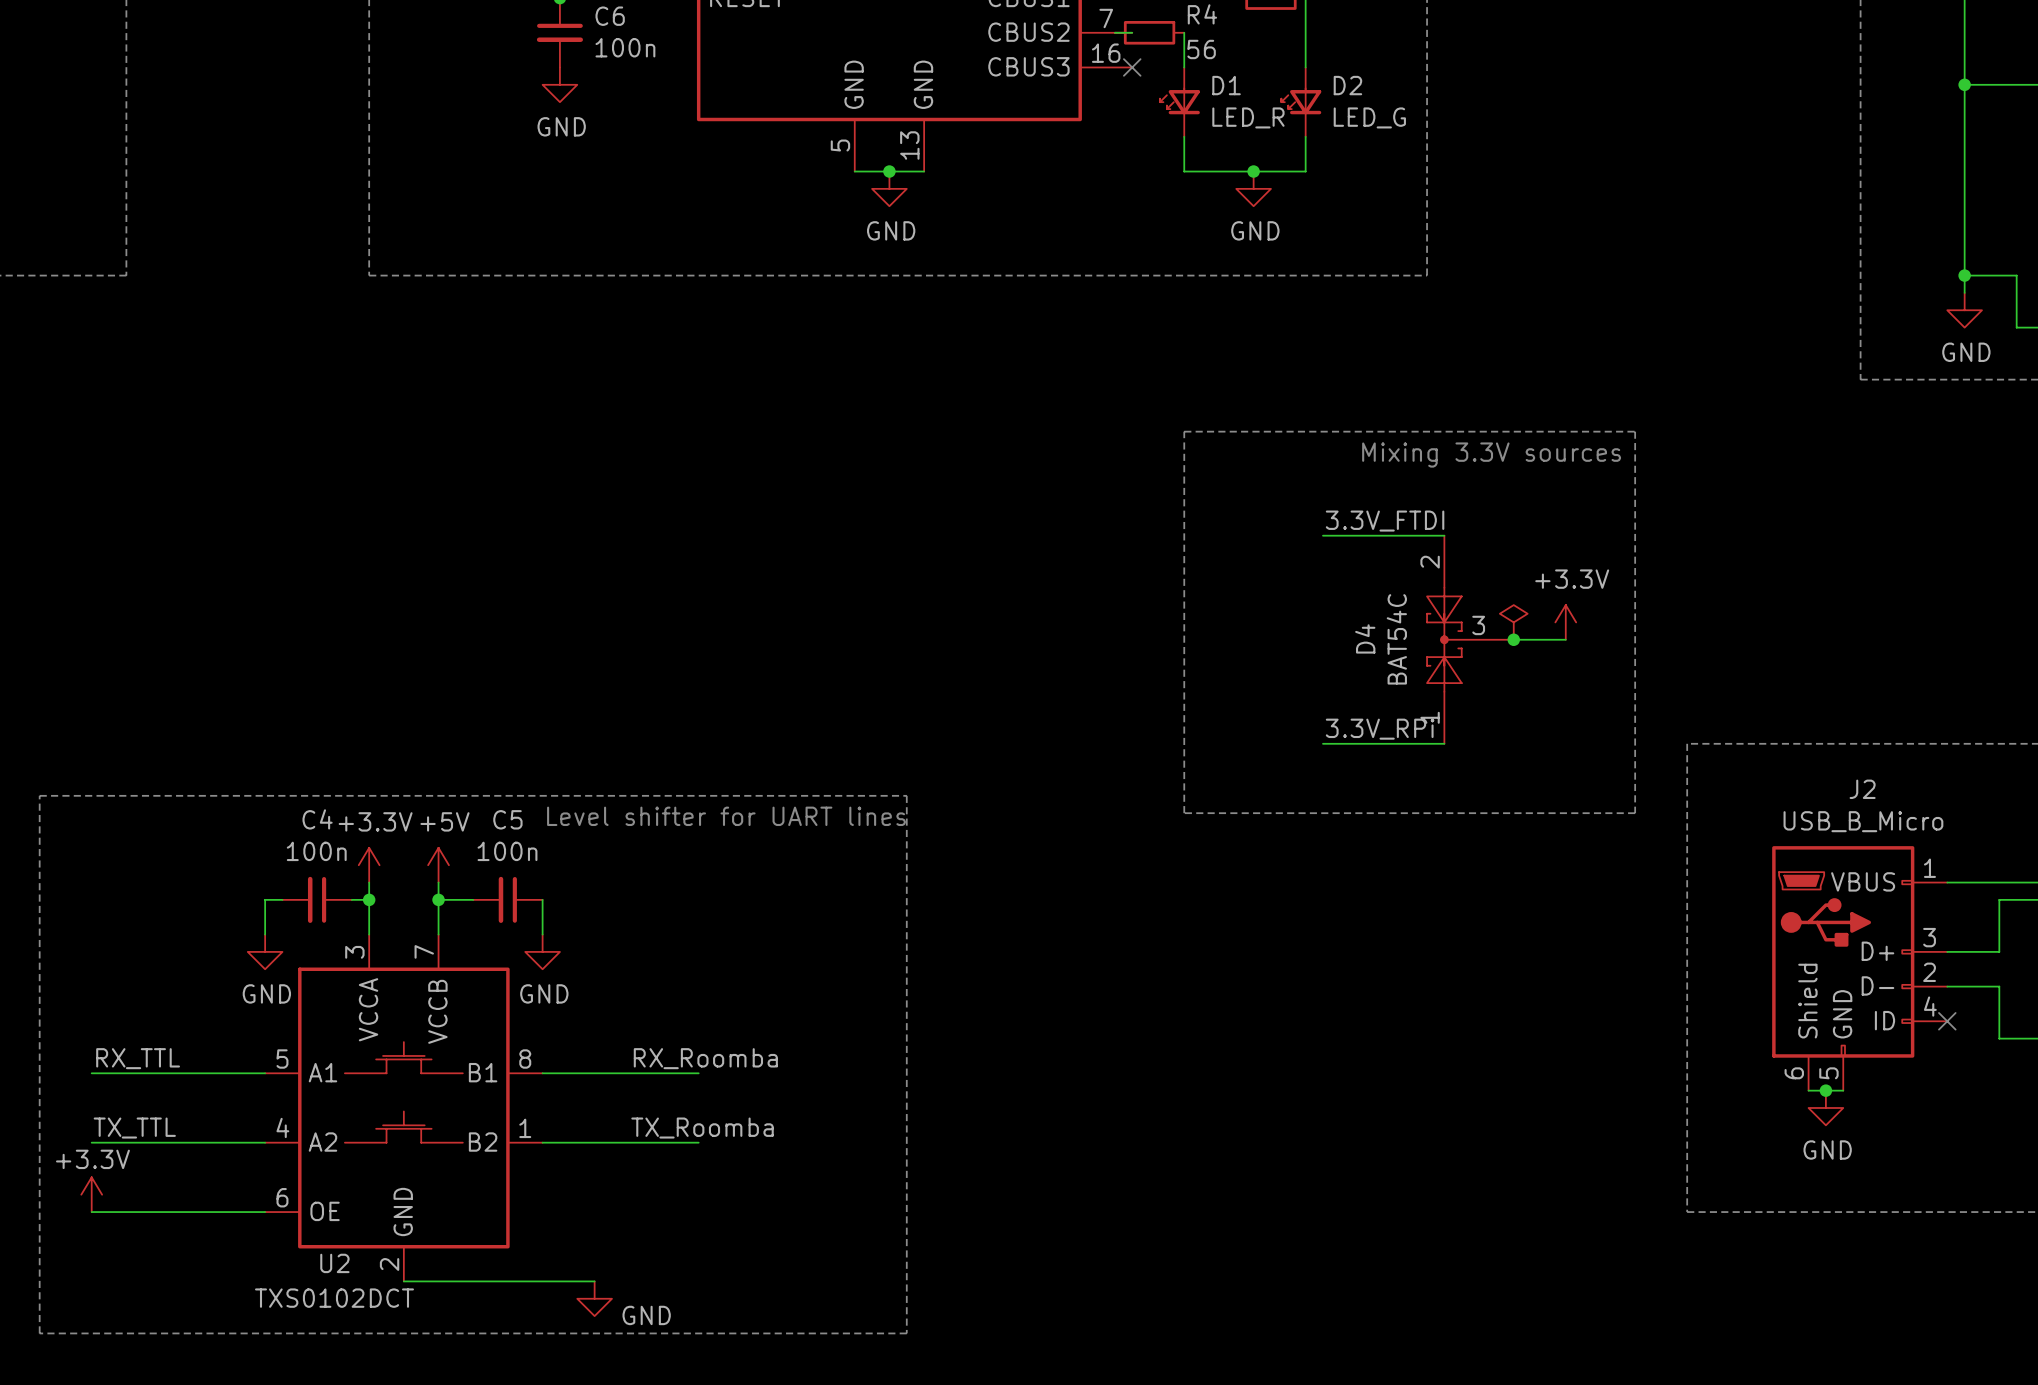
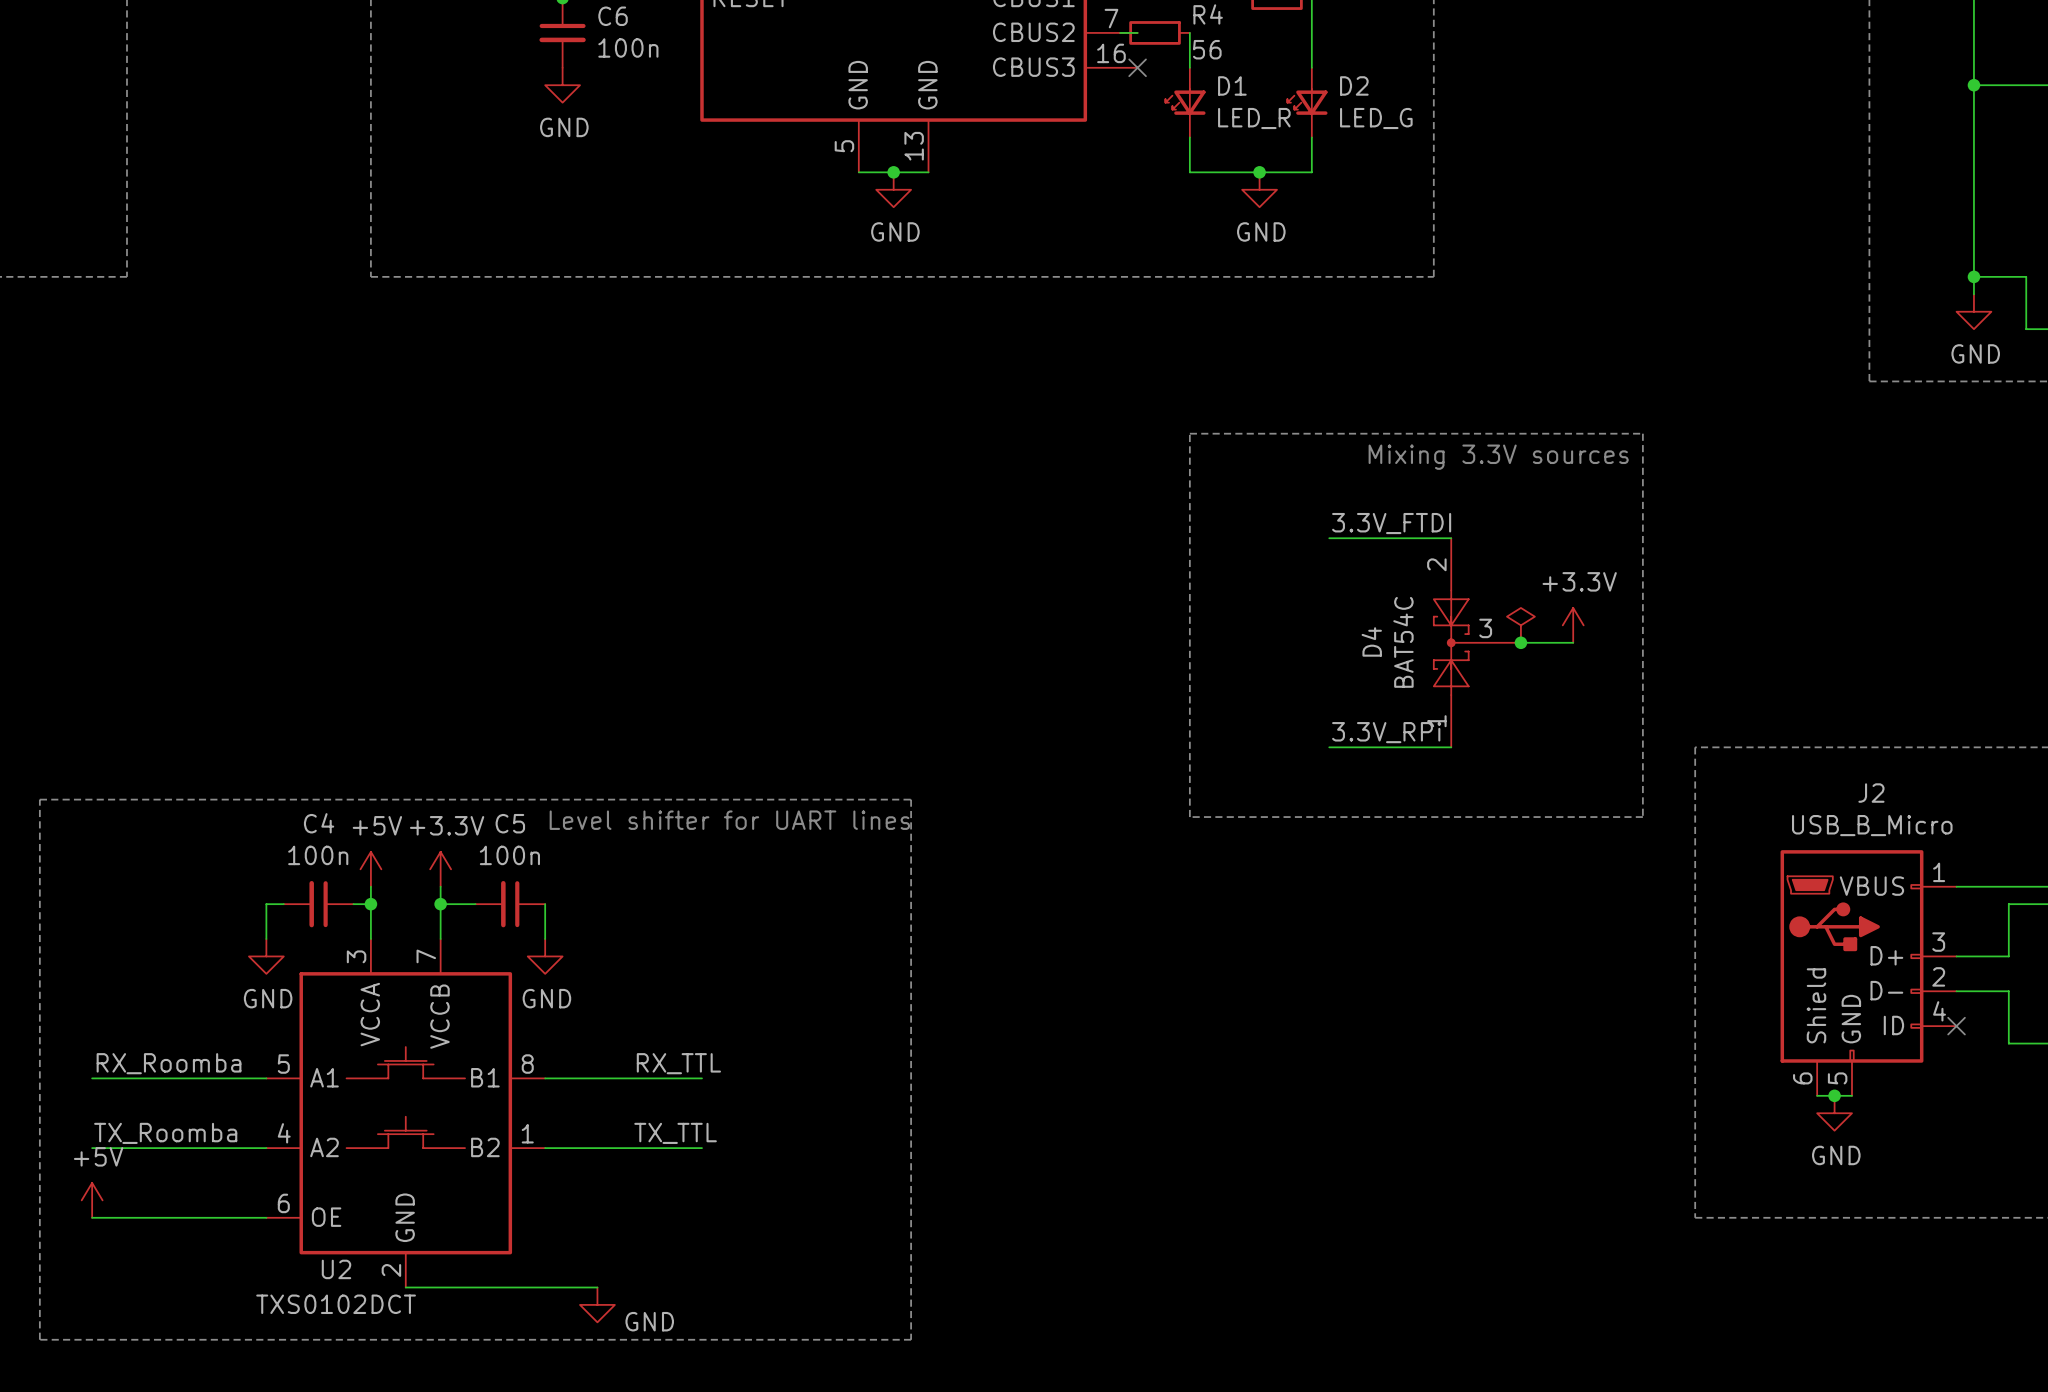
power symbol: +3.3V (369, 865) -> +5V (370, 869)
power symbol: +5V (438, 865) -> +3.3V (440, 869)
label: RX_TTL (138, 1058) -> RX_Roomba (169, 1063)
label: RX_Roomba (705, 1058) -> RX_TTL (678, 1063)
label: TX_TTL (134, 1128) -> TX_Roomba (165, 1133)
label: TX_Roomba (702, 1128) -> TX_TTL (675, 1133)
power symbol: +3.3V (91, 1194) -> +5V (92, 1200)

